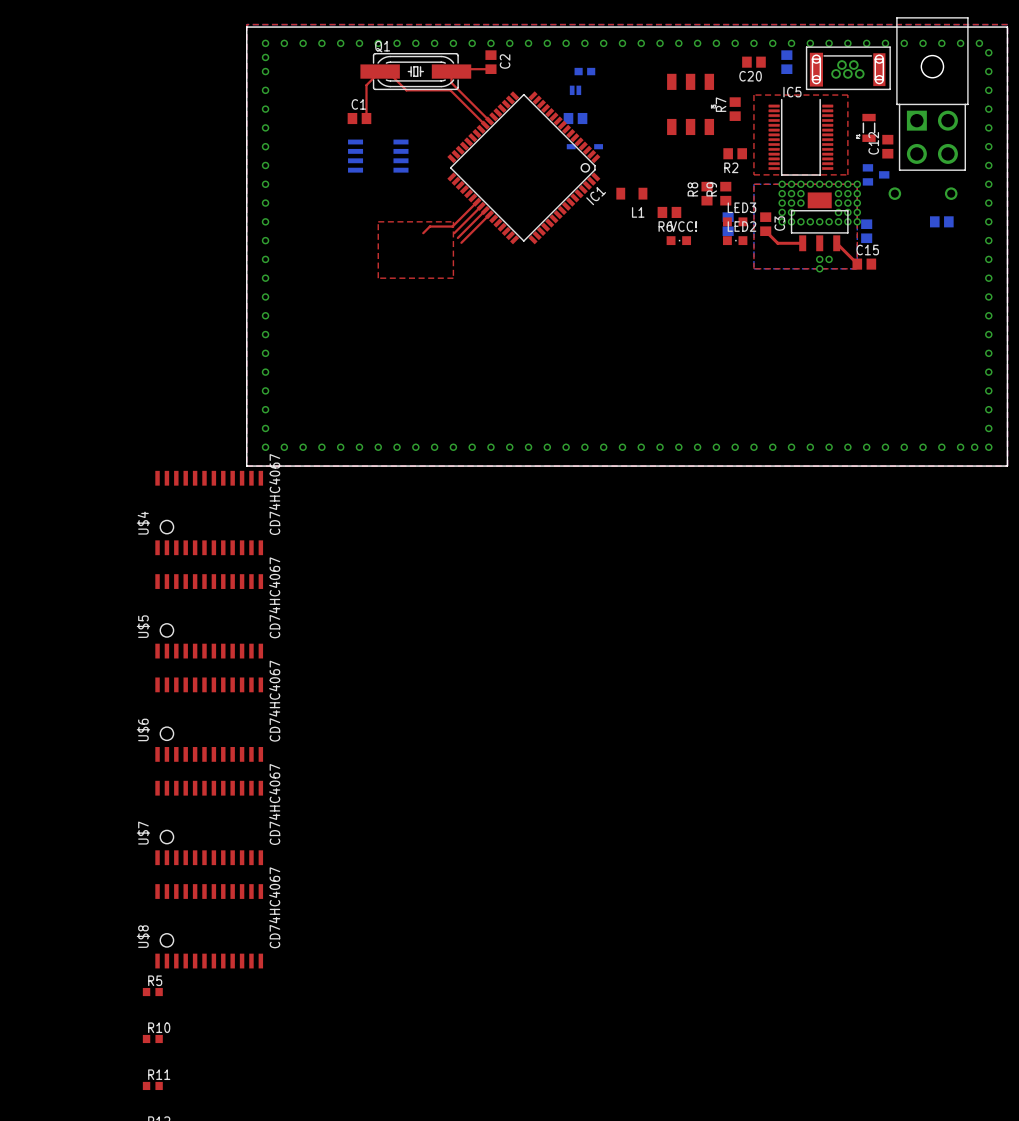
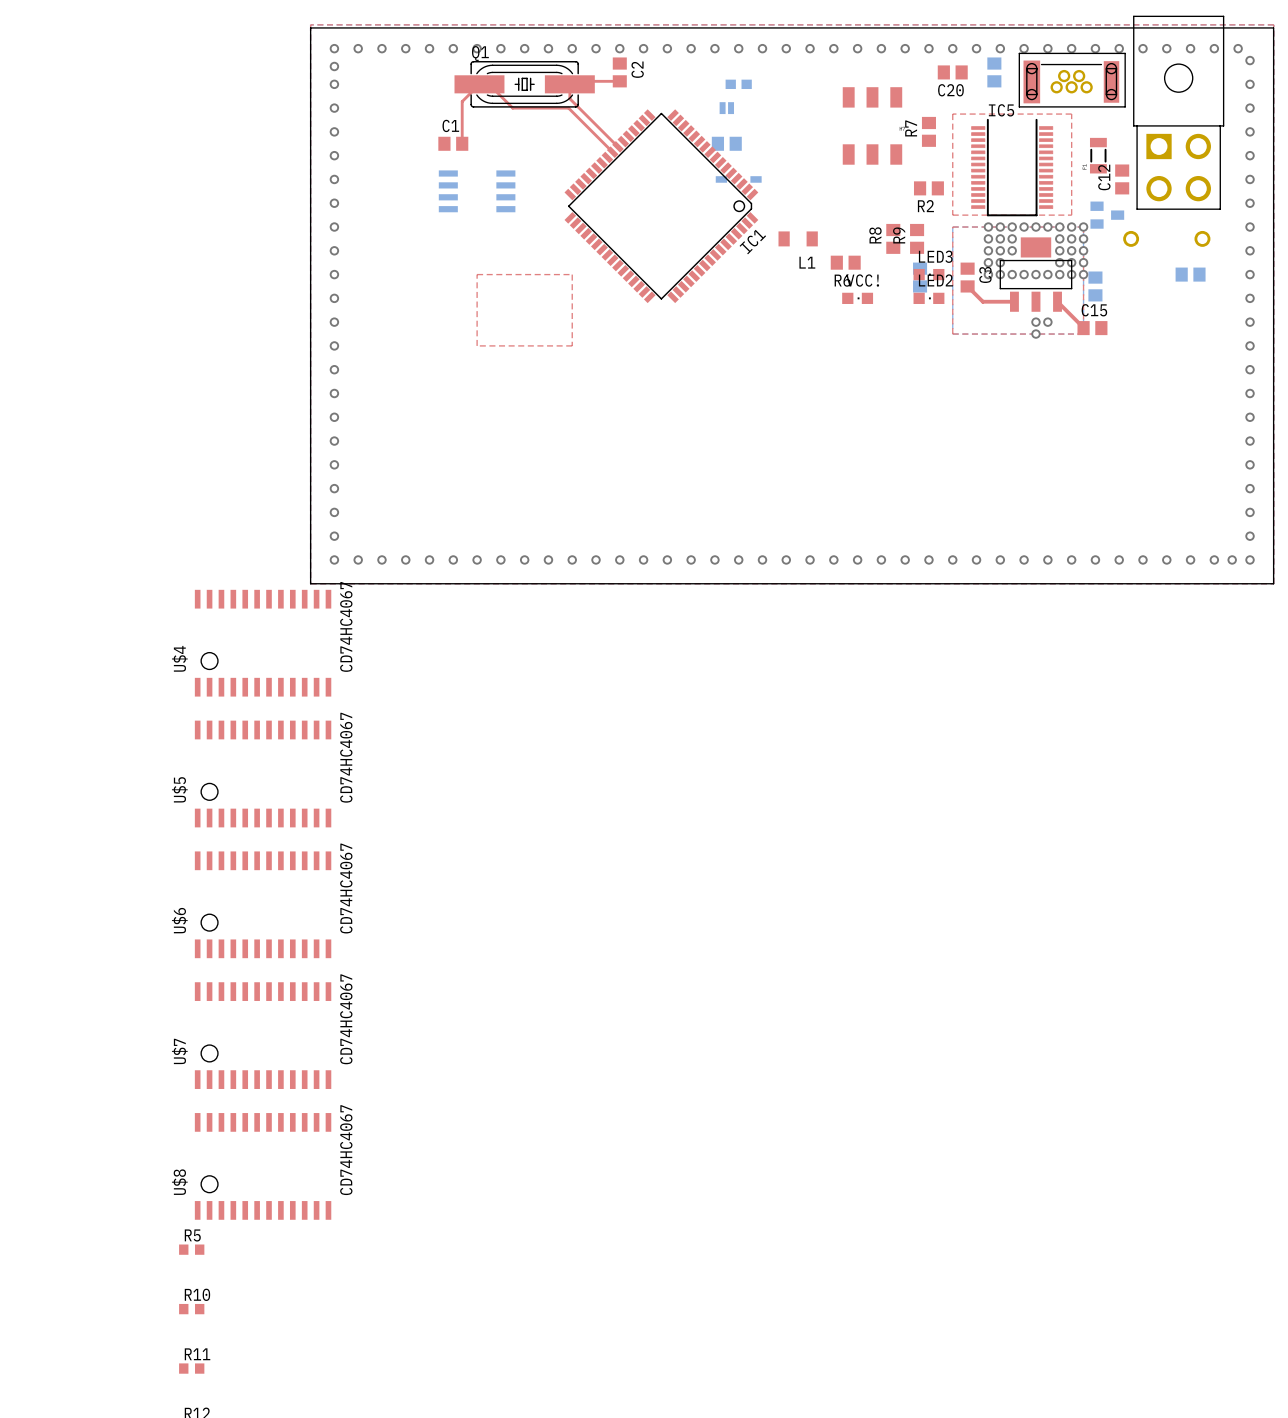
top track: (476, 202) (452, 226) (429, 226) (423, 233) -> none
top track: (481, 206) (454, 233) -> none
top track: (485, 210) (457, 237) -> none
top track: (489, 214) (461, 242) -> none

